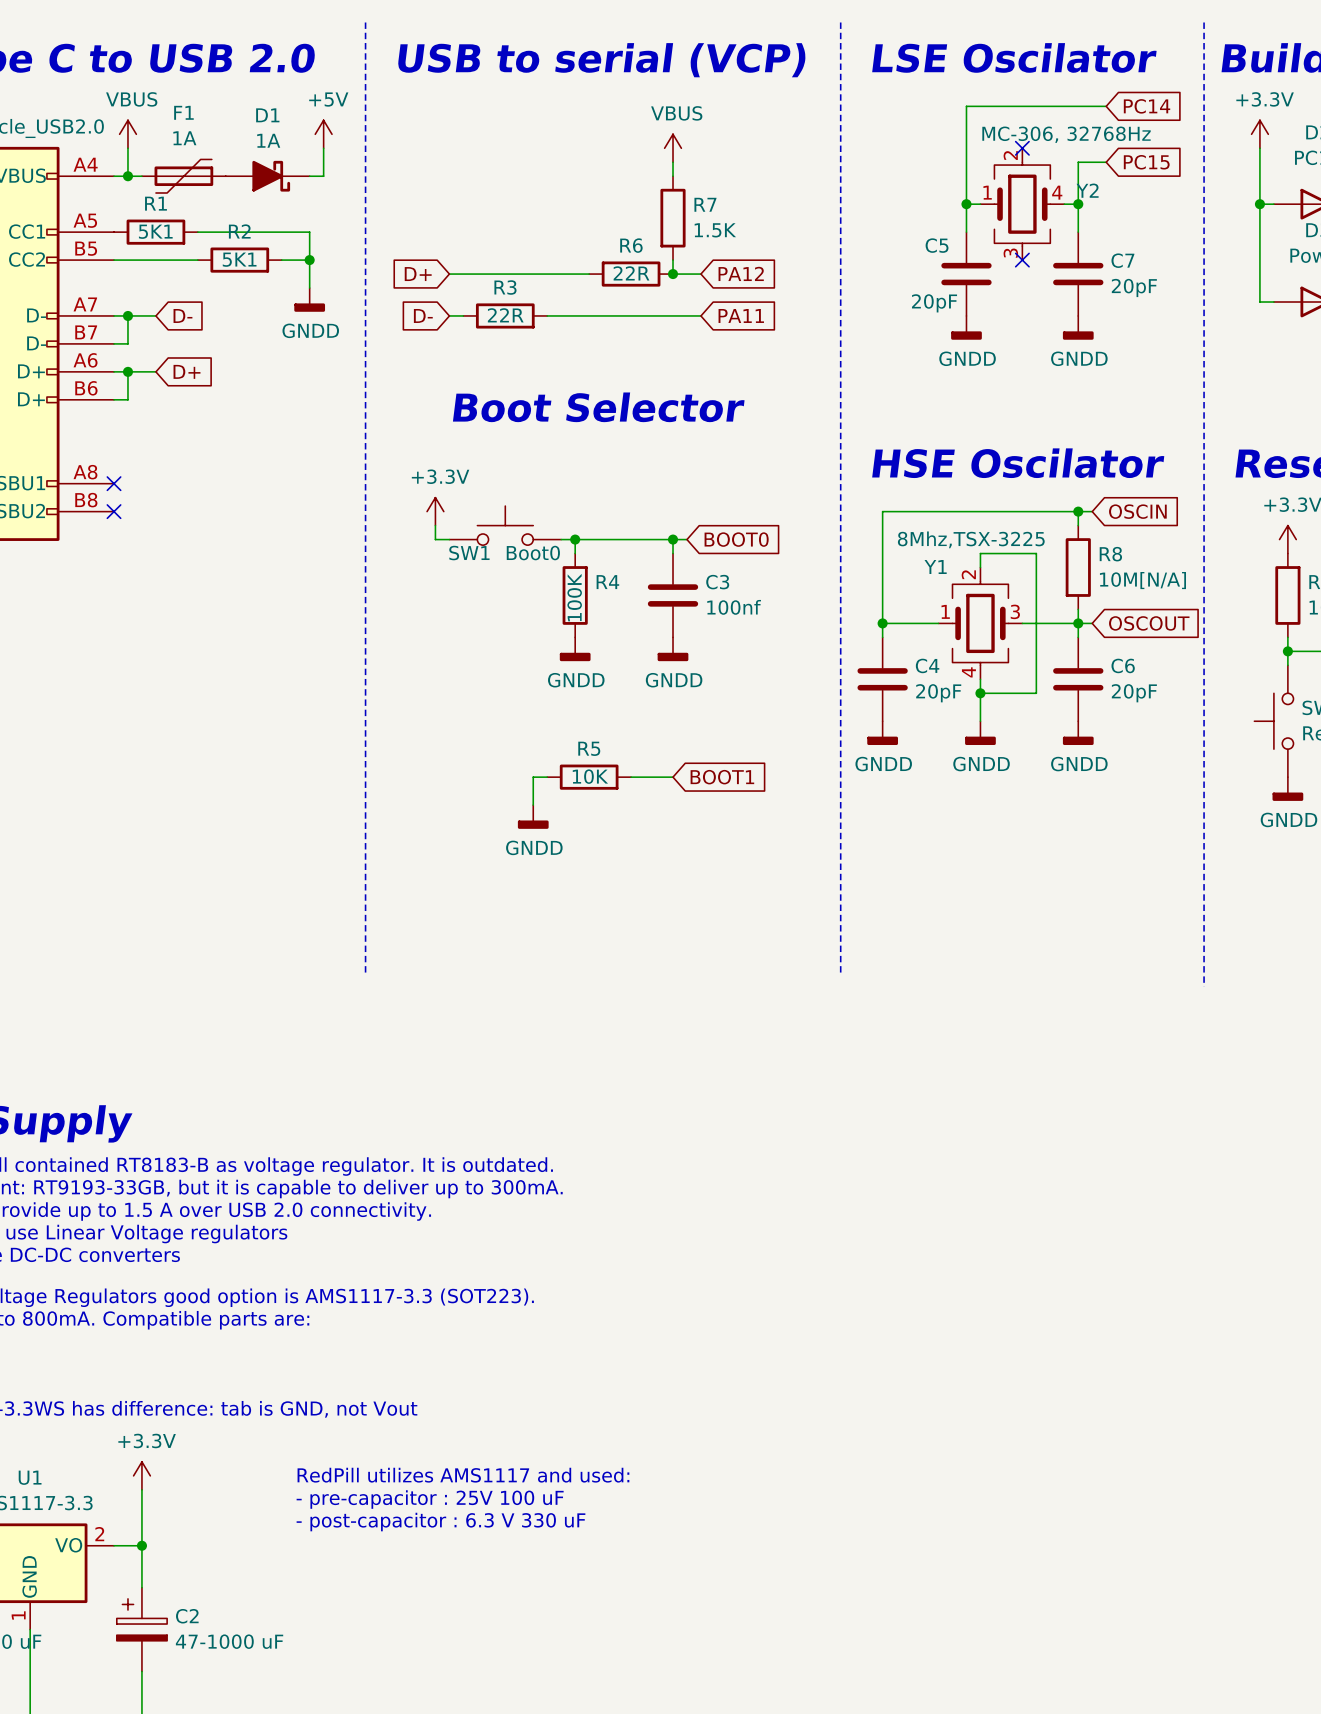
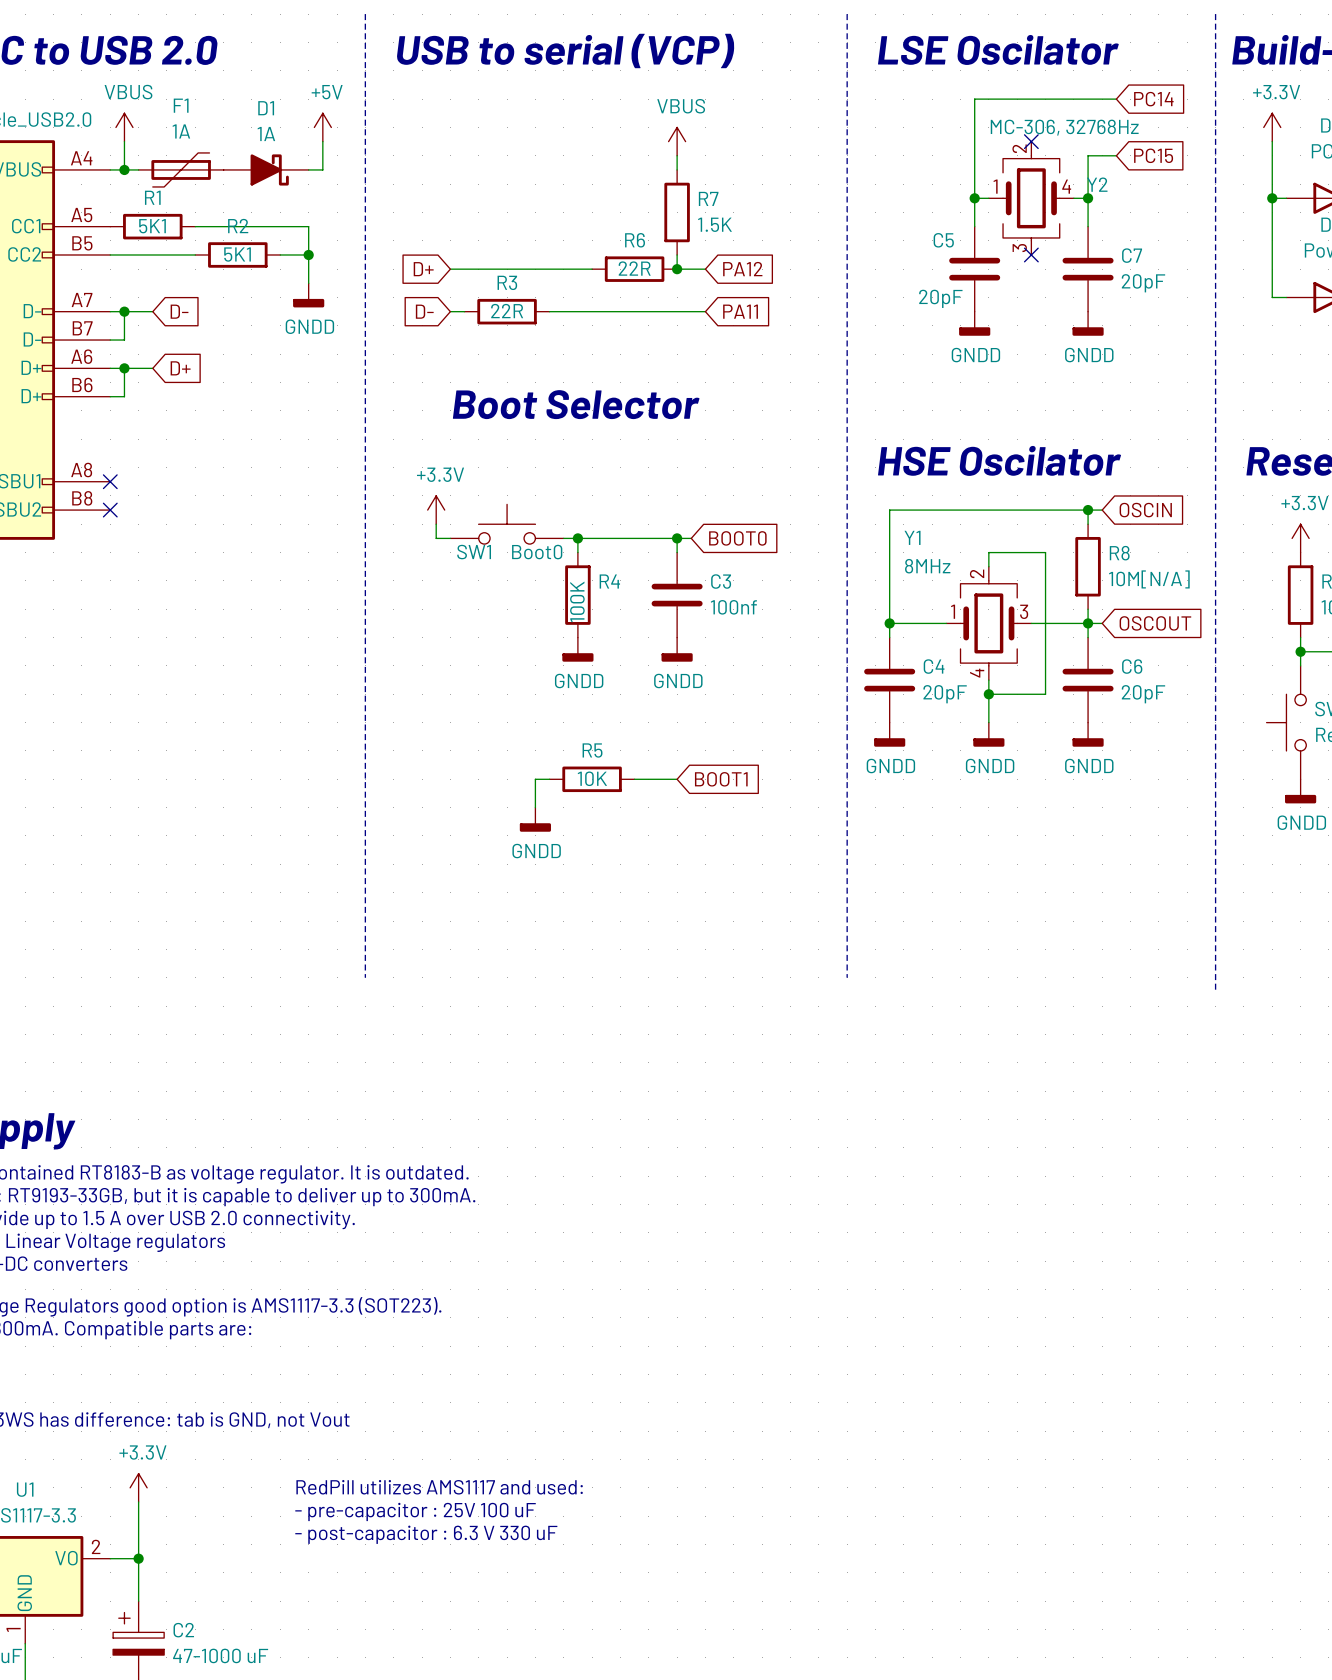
Y1 value: 8Mhz,TSX-3225 (971, 539) -> 8MHz (927, 566)
Y1 name position: Y1 (935, 567) -> Y1 (912, 537)

